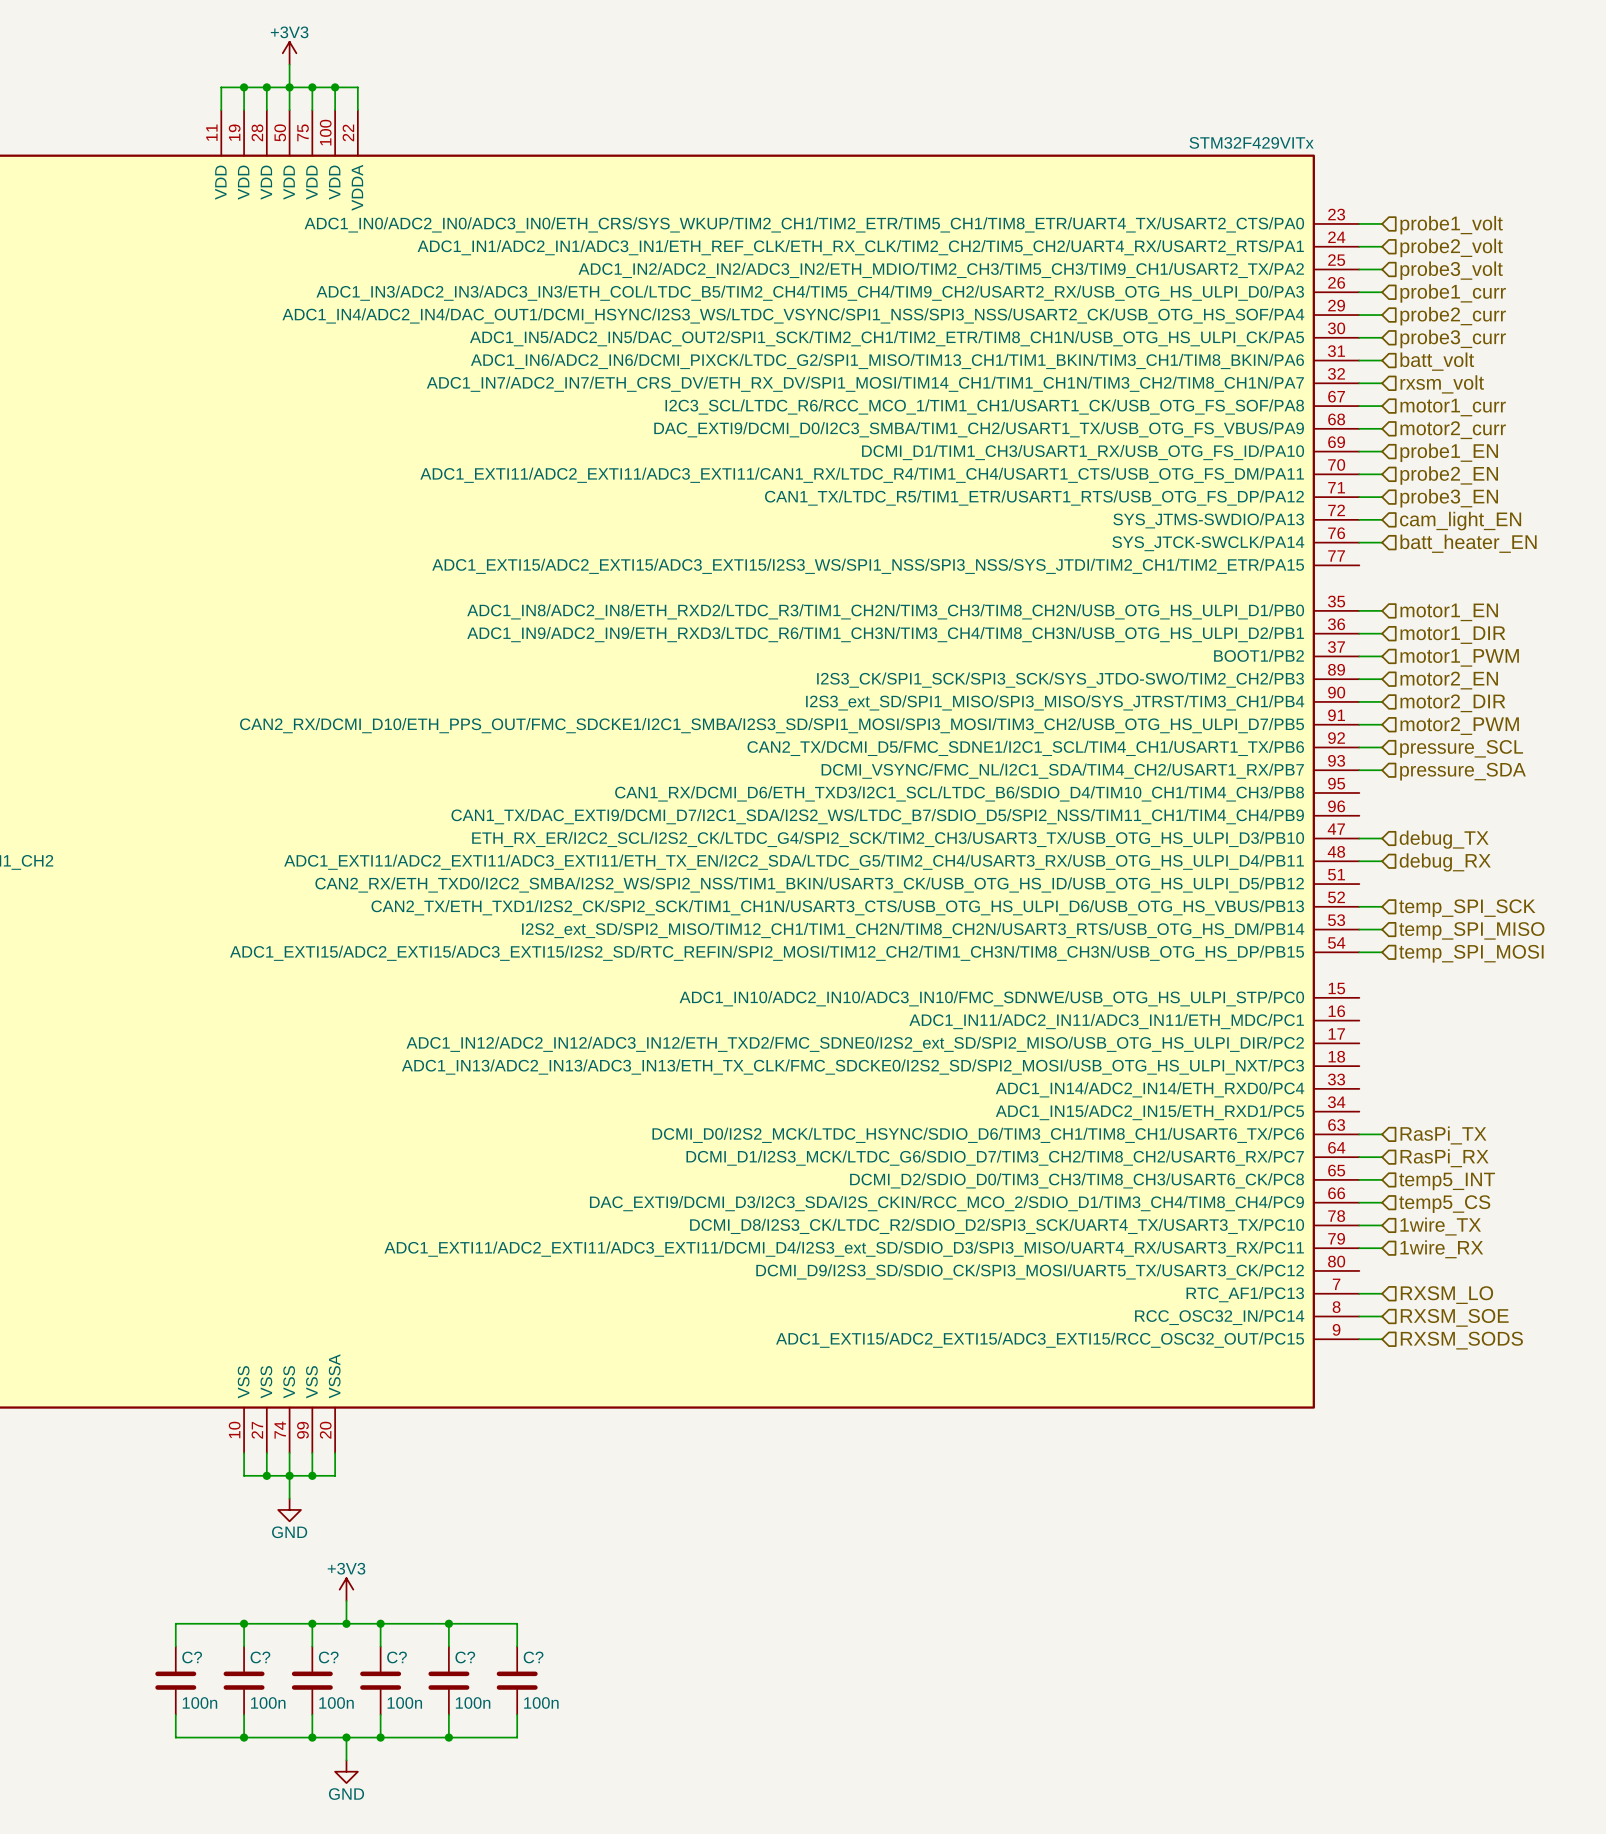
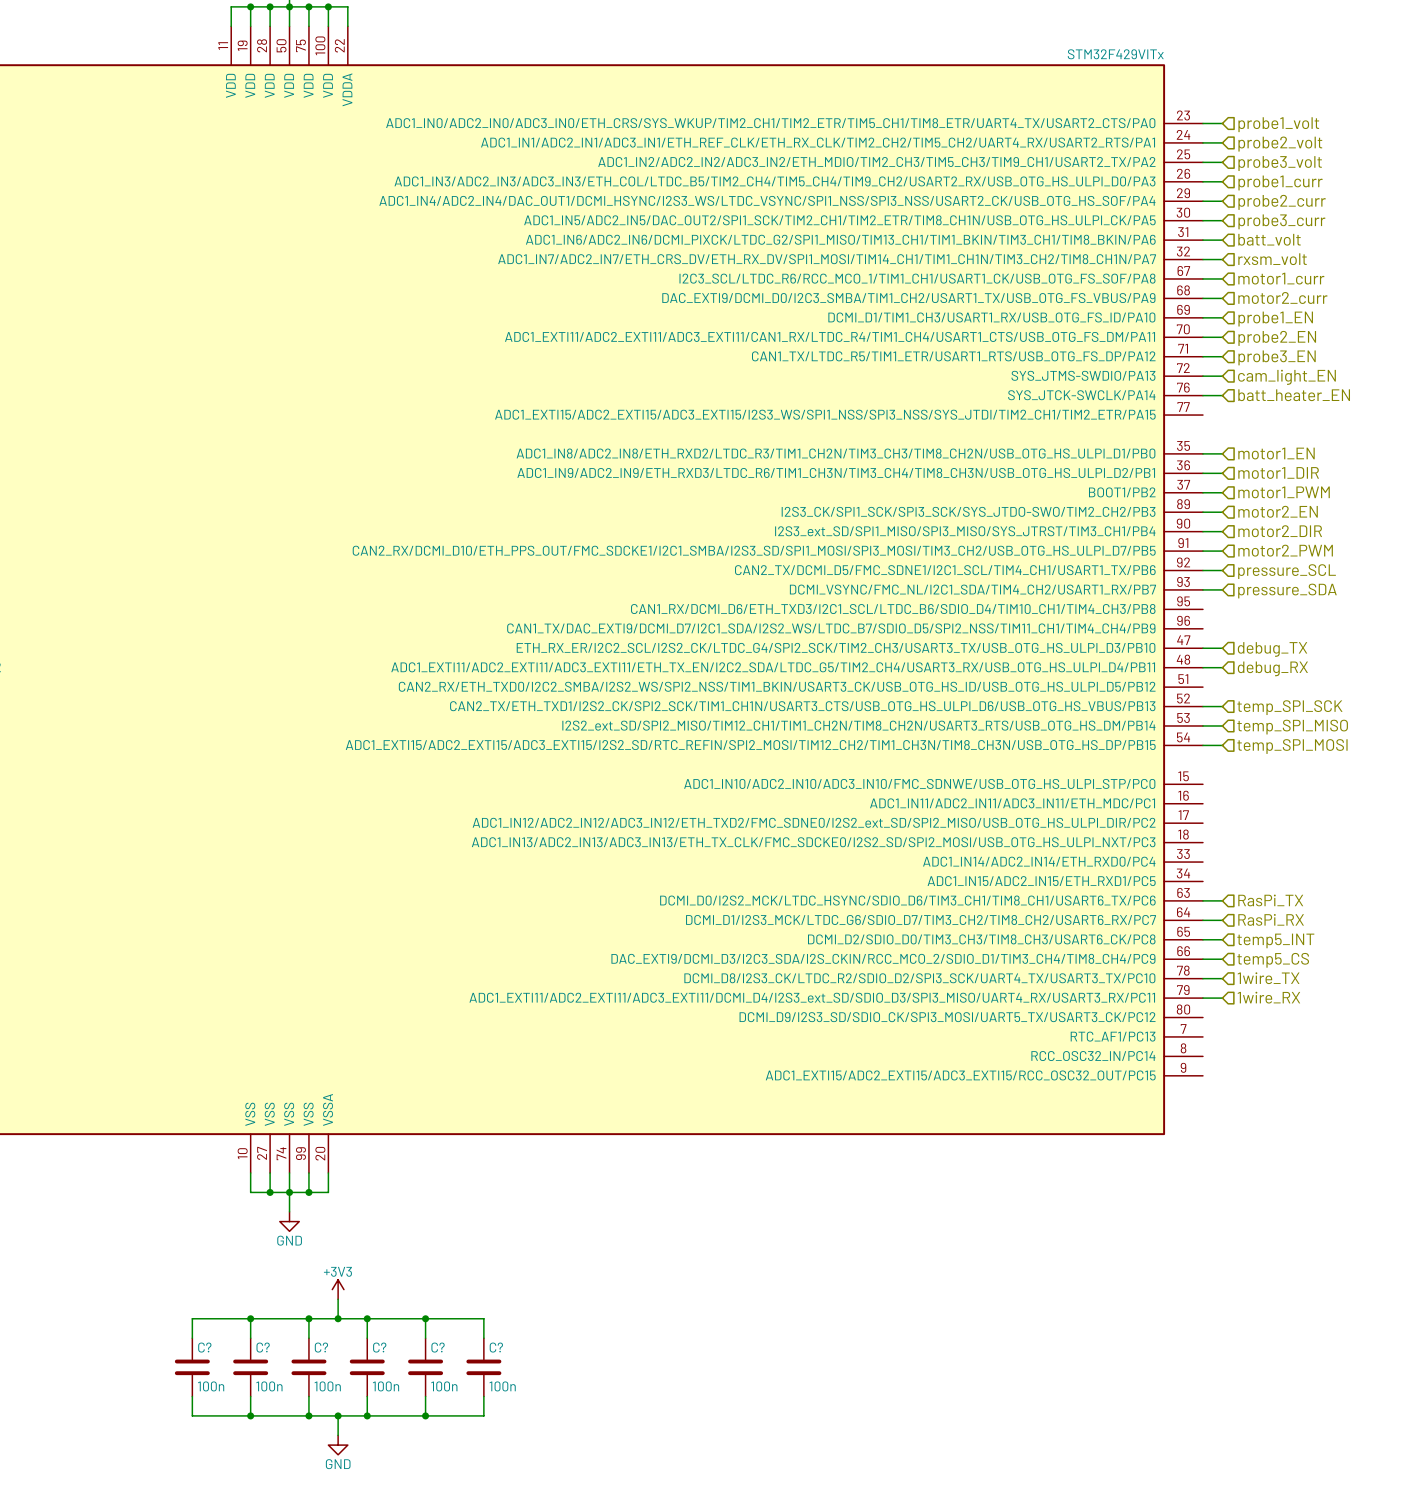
wire: (1359, 1293) (1382, 1293) -> none
hierarchical label: RXSM_LO (1446, 1295) -> none
wire: (1359, 1316) (1382, 1316) -> none
hierarchical label: RXSM_SOE (1454, 1317) -> none
wire: (1359, 1339) (1382, 1339) -> none
hierarchical label: RXSM_SODS (1461, 1340) -> none

